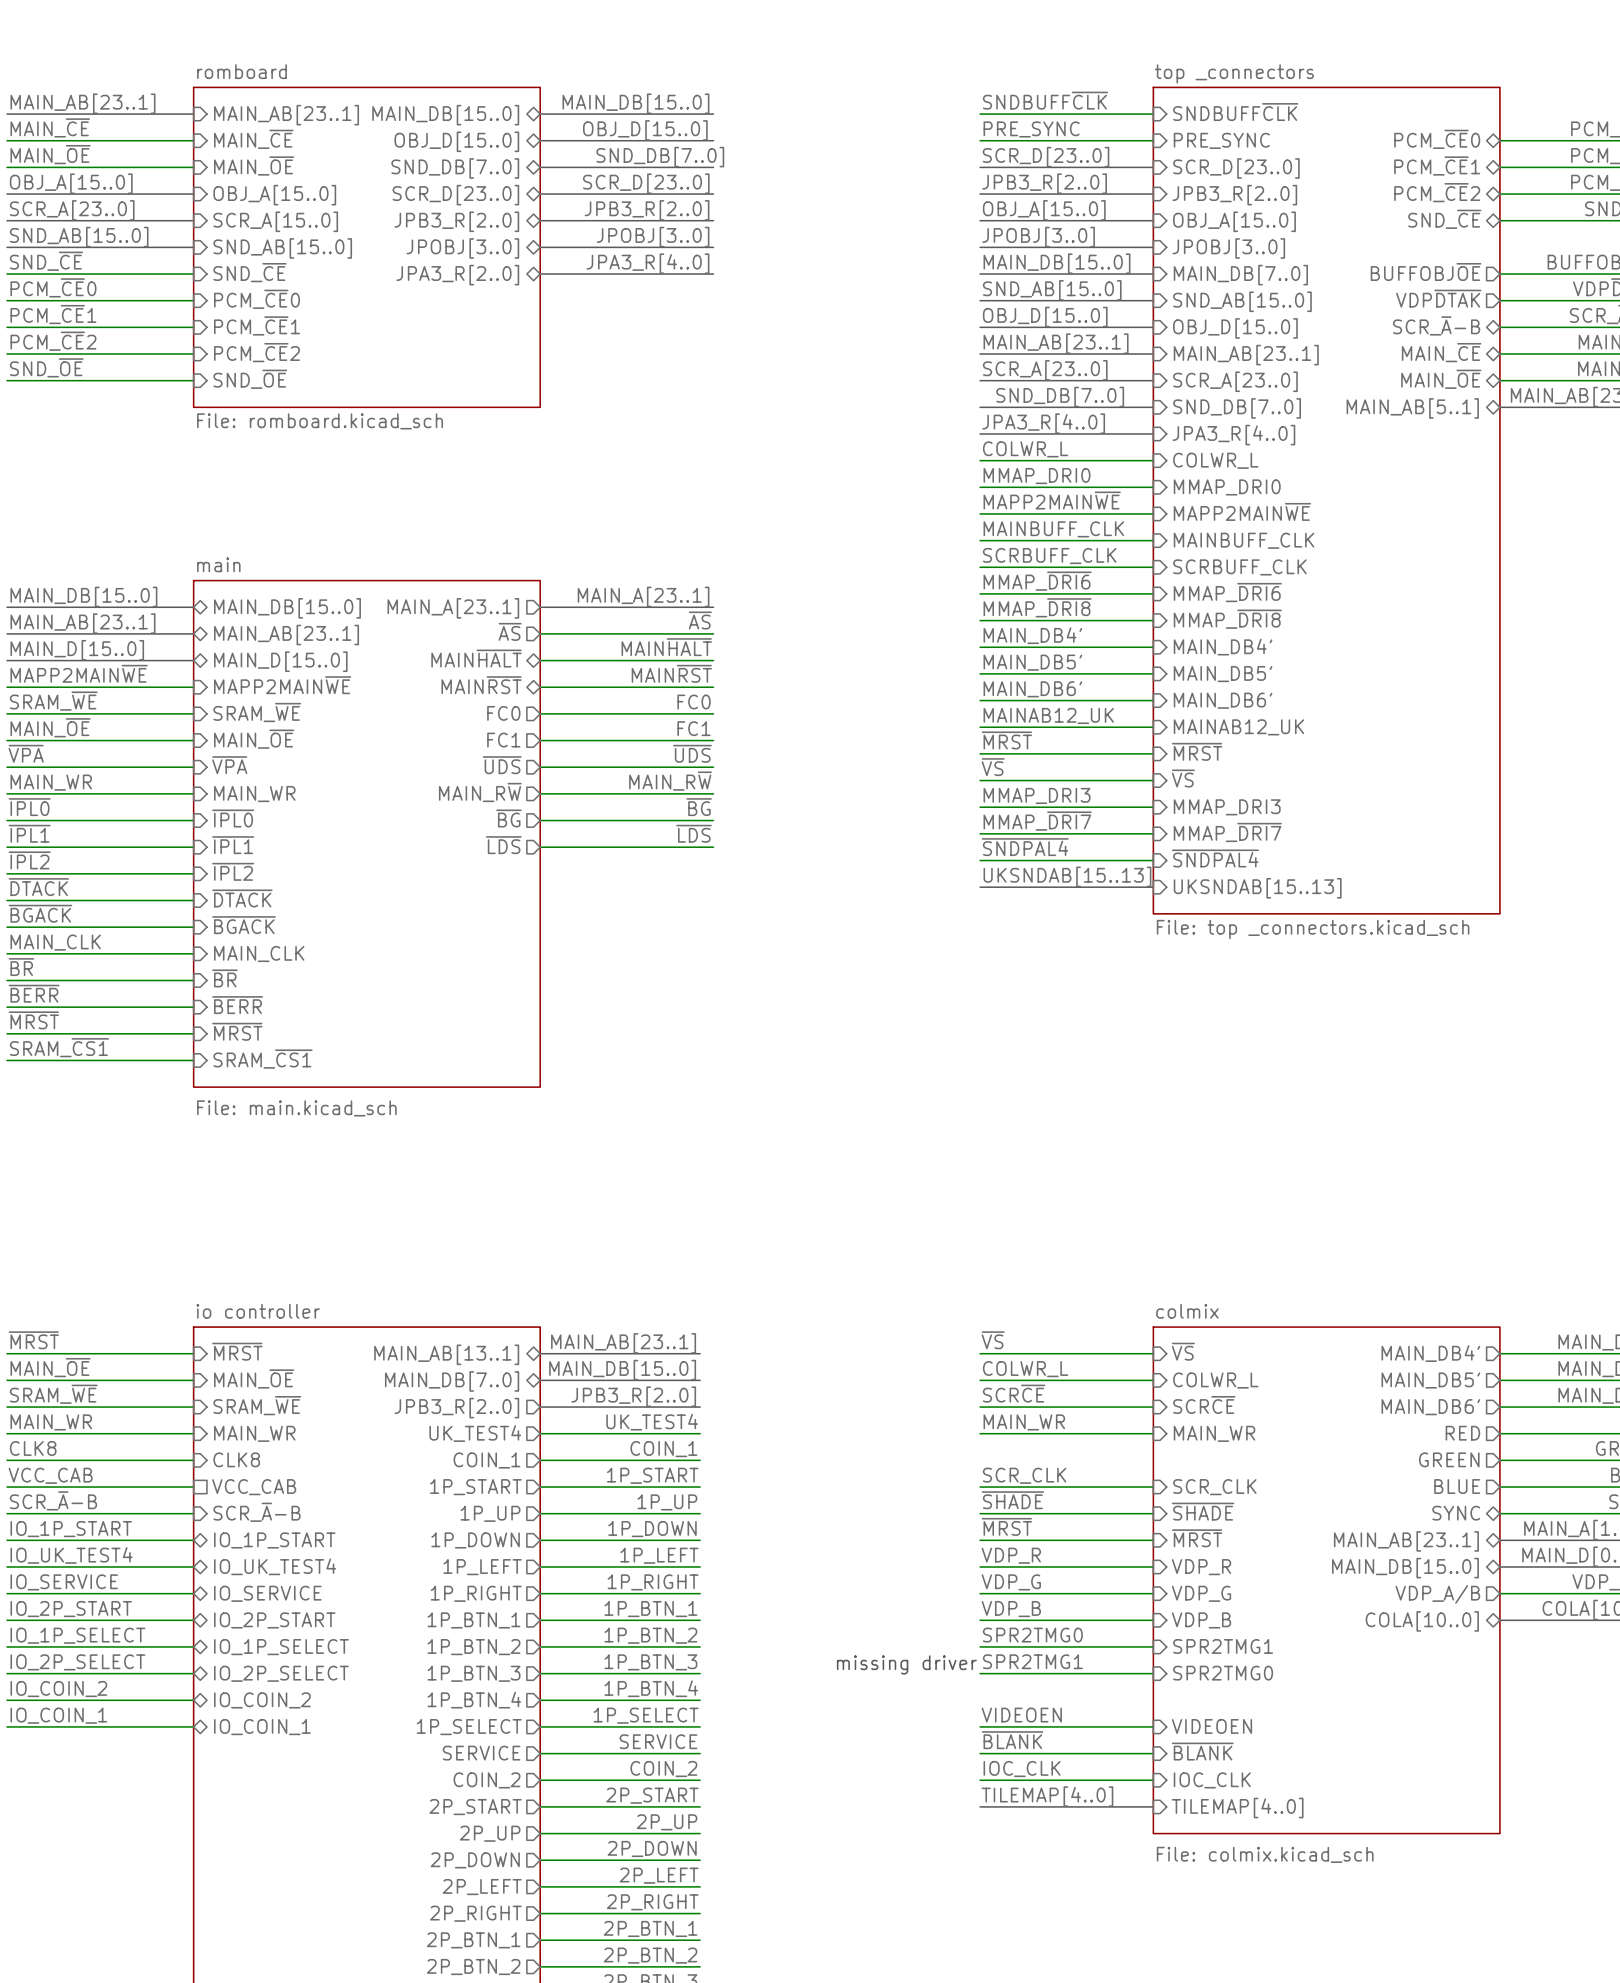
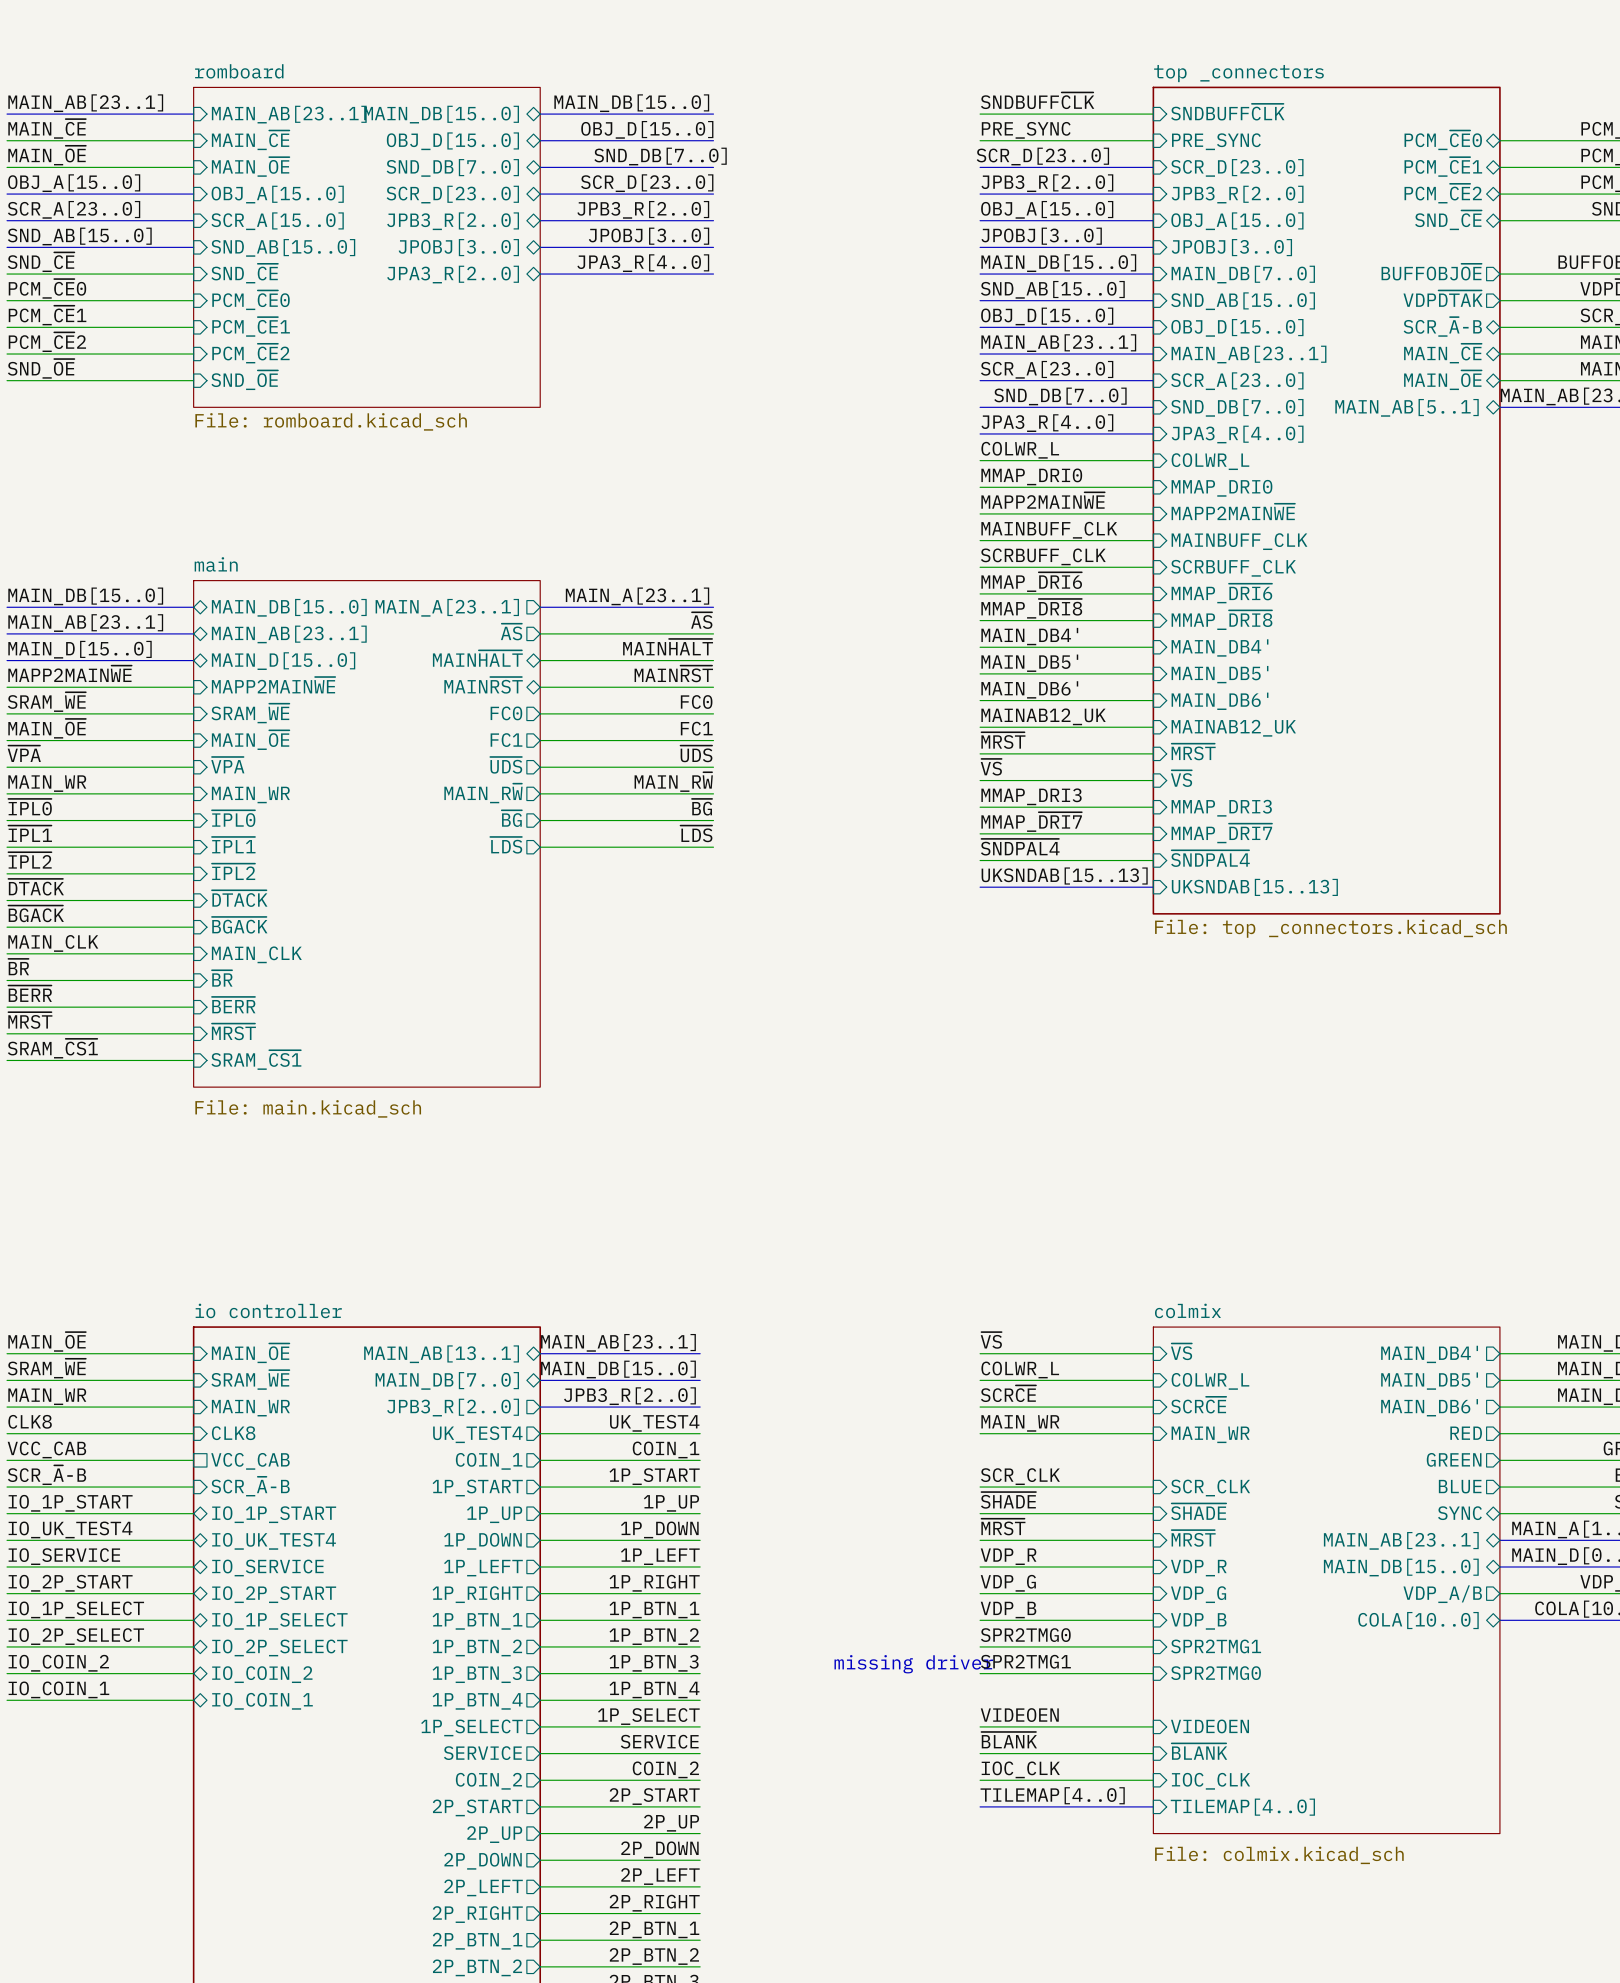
label: ~{MRST} (33, 1340) -> MAIN_~{OE} (47, 1341)
sheet pin: ~{MRST} (237, 1351) -> MAIN_~{OE} (250, 1353)
label: MAIN_~{OE} (50, 1367) -> SRAM_~{WE} (46, 1368)
sheet pin: MAIN_~{OE} (254, 1378) -> SRAM_~{WE} (250, 1379)
label: SRAM_~{WE} (53, 1394) -> MAIN_WR (47, 1396)
sheet pin: SRAM_~{WE} (257, 1405) -> MAIN_WR (250, 1408)
label: MAIN_WR (51, 1422) -> CLK8 (30, 1421)
sheet pin: MAIN_WR (254, 1433) -> CLK8 (233, 1433)
label: CLK8 (33, 1448) -> VCC_CAB (46, 1449)
sheet pin shape: input (236, 1459) -> passive (250, 1461)
sheet pin: CLK8 (236, 1459) -> VCC_CAB (250, 1461)
label: VCC_CAB (50, 1475) -> SCR_~{A}-B (47, 1475)
sheet pin shape: passive (254, 1487) -> input (250, 1486)
sheet pin: VCC_CAB (254, 1487) -> SCR_~{A}-B (250, 1486)
label: SCR_~{A}-B (53, 1500) -> IO_1P_START (70, 1503)
sheet pin shape: input (257, 1512) -> bidirectional (274, 1514)
sheet pin: SCR_~{A}-B (257, 1512) -> IO_1P_START (274, 1514)
label: IO_1P_START (71, 1529) -> IO_UK_TEST4 (70, 1529)
sheet pin: IO_1P_START (274, 1540) -> IO_UK_TEST4 (274, 1541)
label: IO_UK_TEST4 (71, 1555) -> IO_SERVICE (64, 1556)
sheet pin: IO_UK_TEST4 (275, 1566) -> IO_SERVICE (267, 1567)
label: IO_SERVICE (64, 1582) -> IO_2P_START (70, 1583)
sheet pin: IO_SERVICE (267, 1593) -> IO_2P_START (274, 1594)
label: IO_2P_START (71, 1609) -> IO_1P_SELECT (76, 1609)
sheet pin: IO_2P_START (274, 1620) -> IO_1P_SELECT (279, 1621)
label: IO_1P_SELECT (77, 1635) -> IO_2P_SELECT (76, 1636)
sheet pin: IO_1P_SELECT (281, 1647) -> IO_2P_SELECT (279, 1647)
label: IO_2P_SELECT (77, 1662) -> IO_COIN_2 (58, 1663)
sheet pin: IO_2P_SELECT (281, 1673) -> IO_COIN_2 (262, 1674)
label: IO_COIN_2 (58, 1689) -> IO_COIN_1 (58, 1689)
sheet pin: IO_COIN_2 (262, 1700) -> IO_COIN_1 (262, 1701)
label: IO_COIN_1 (58, 1715) -> none
wire: (7, 1726) (193, 1726) -> none
sheet pin: IO_COIN_1 (262, 1727) -> none

